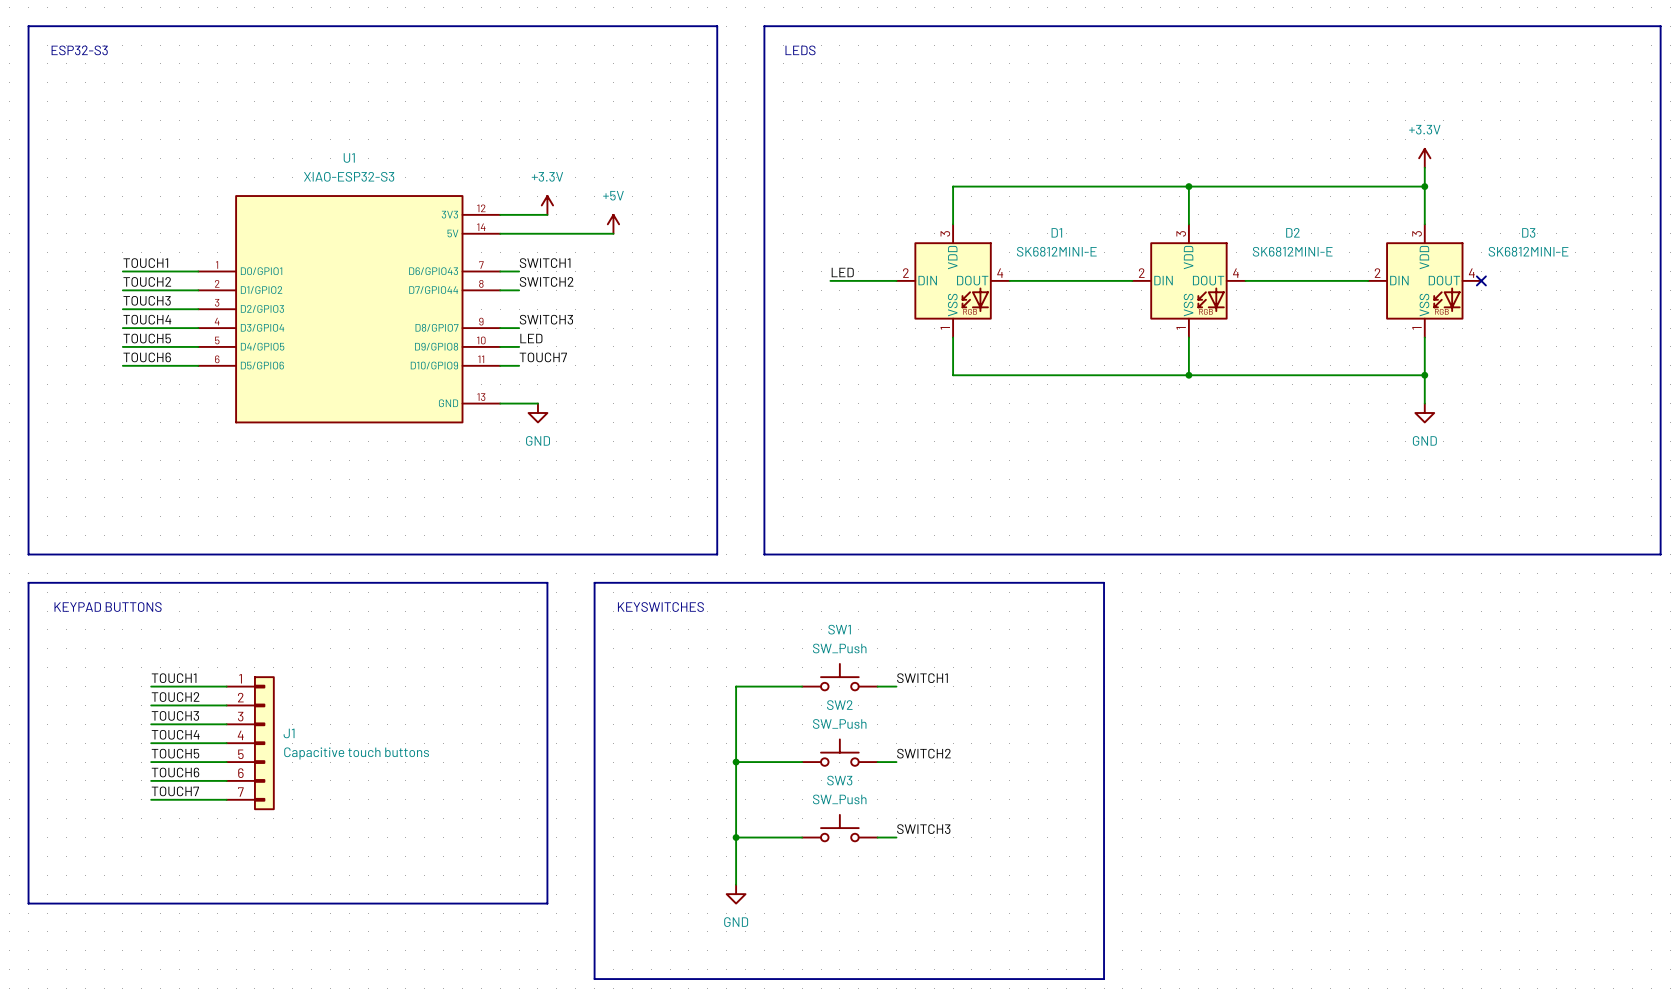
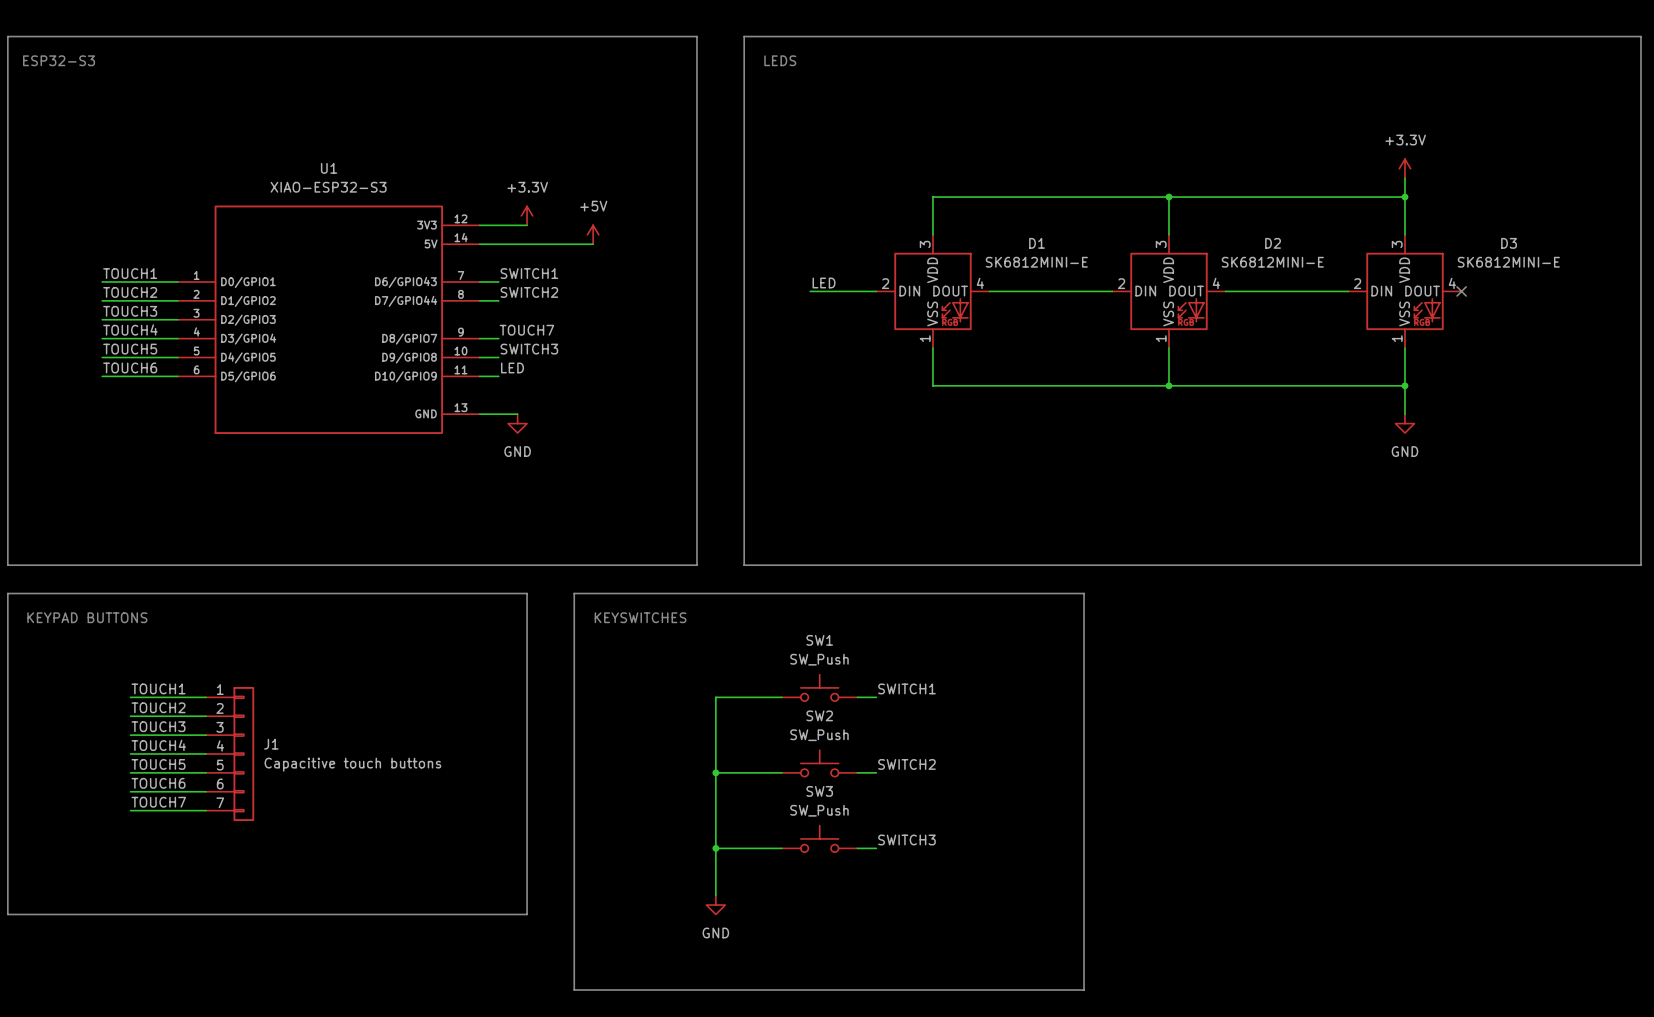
label: SWITCH3 (546, 319) -> TOUCH7 (526, 330)
label: LED (531, 338) -> SWITCH3 (529, 349)
label: TOUCH7 (543, 357) -> LED (512, 367)

